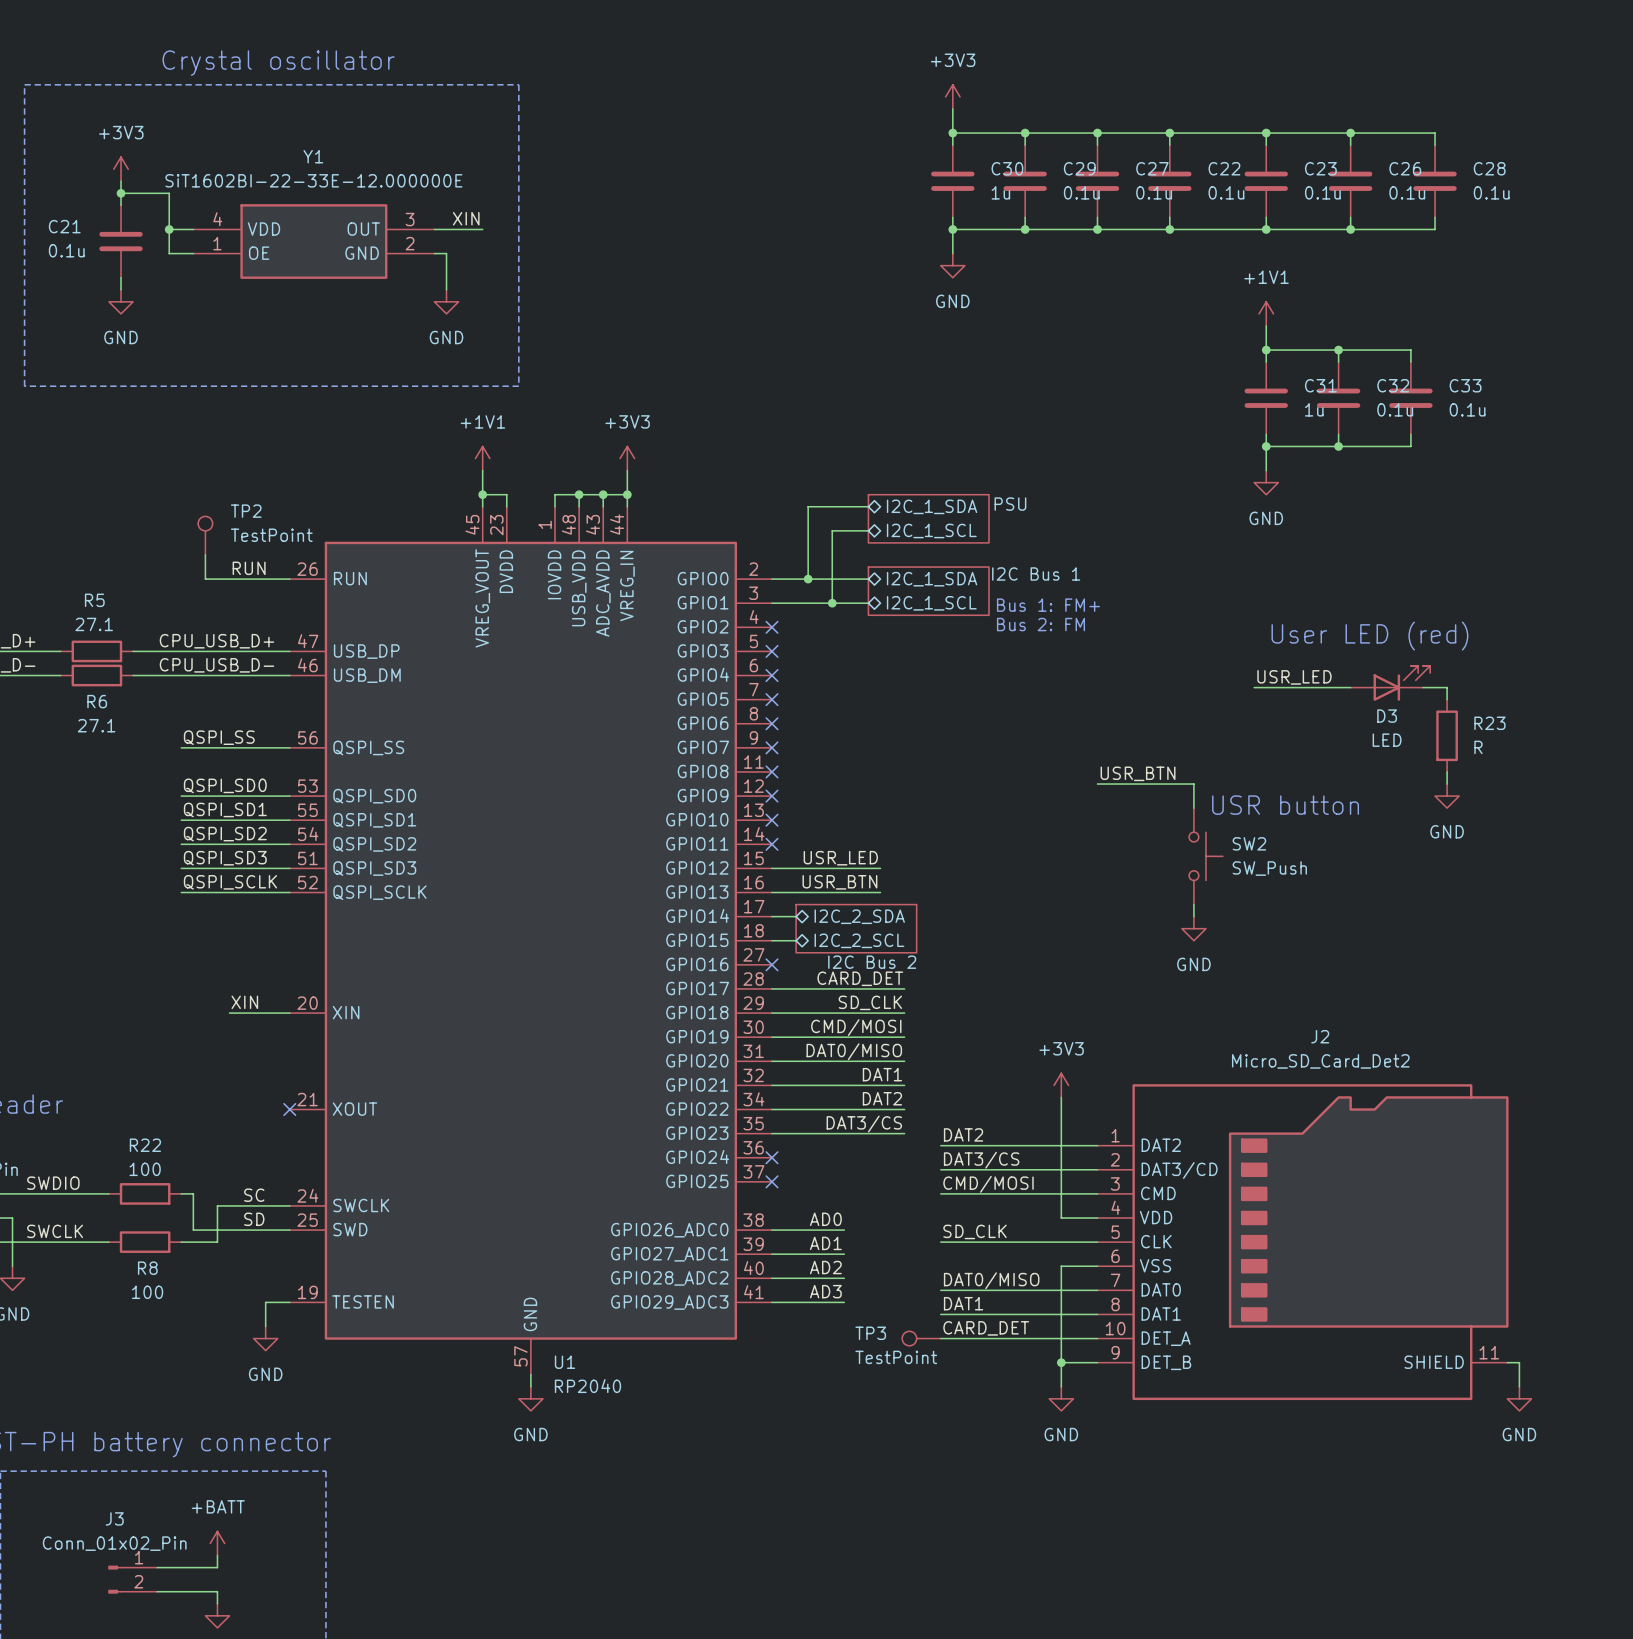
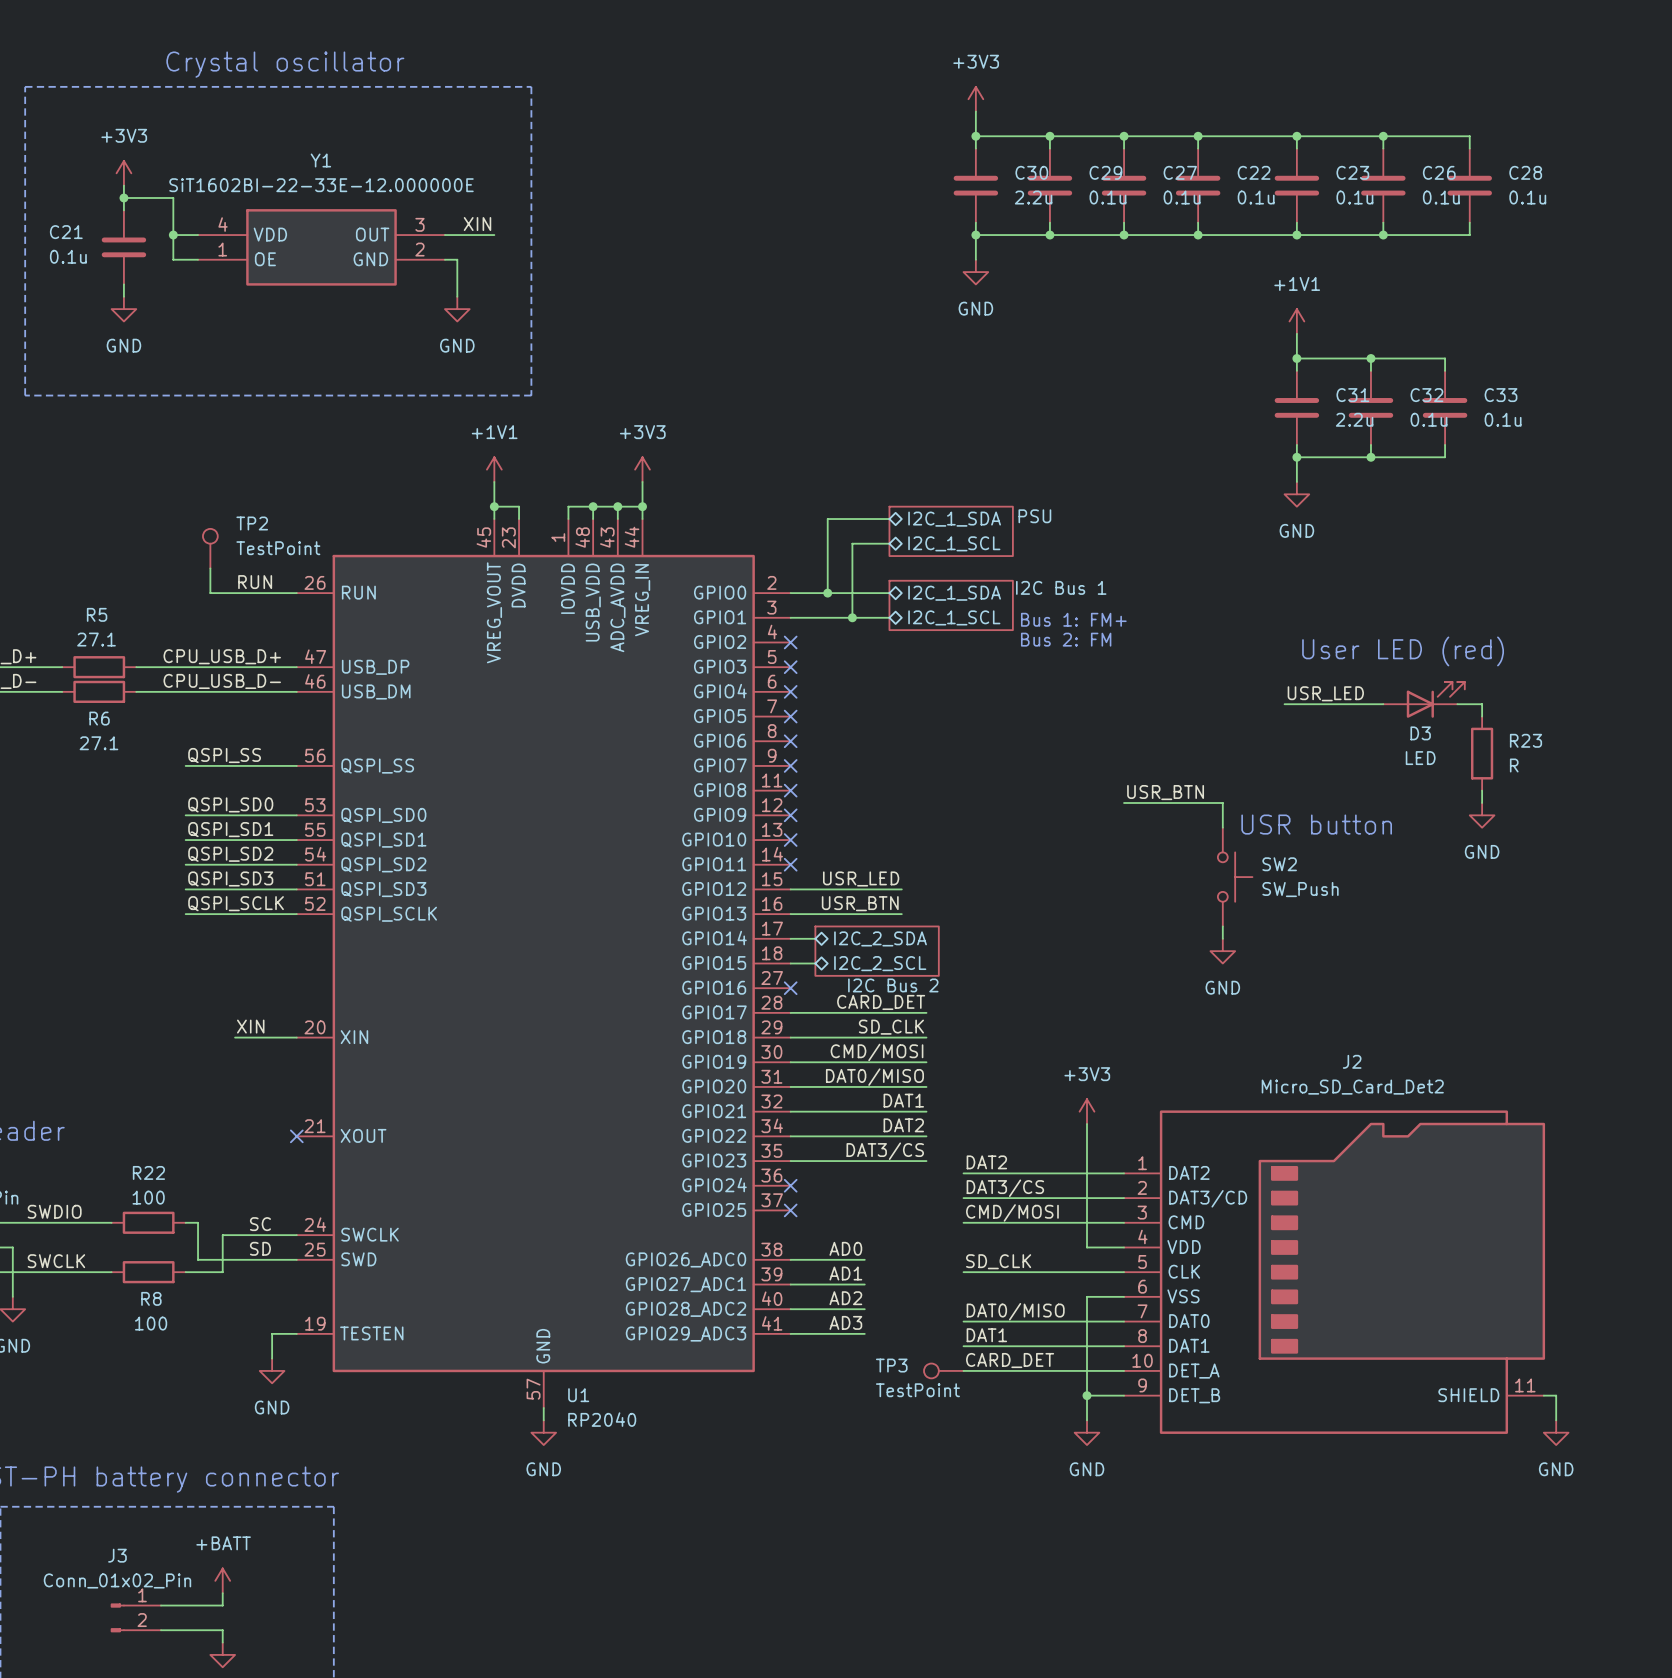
C30 value: 1u (1000, 192) -> 2.2u (1033, 197)
C31 value: 1u (1314, 409) -> 2.2u (1354, 419)

